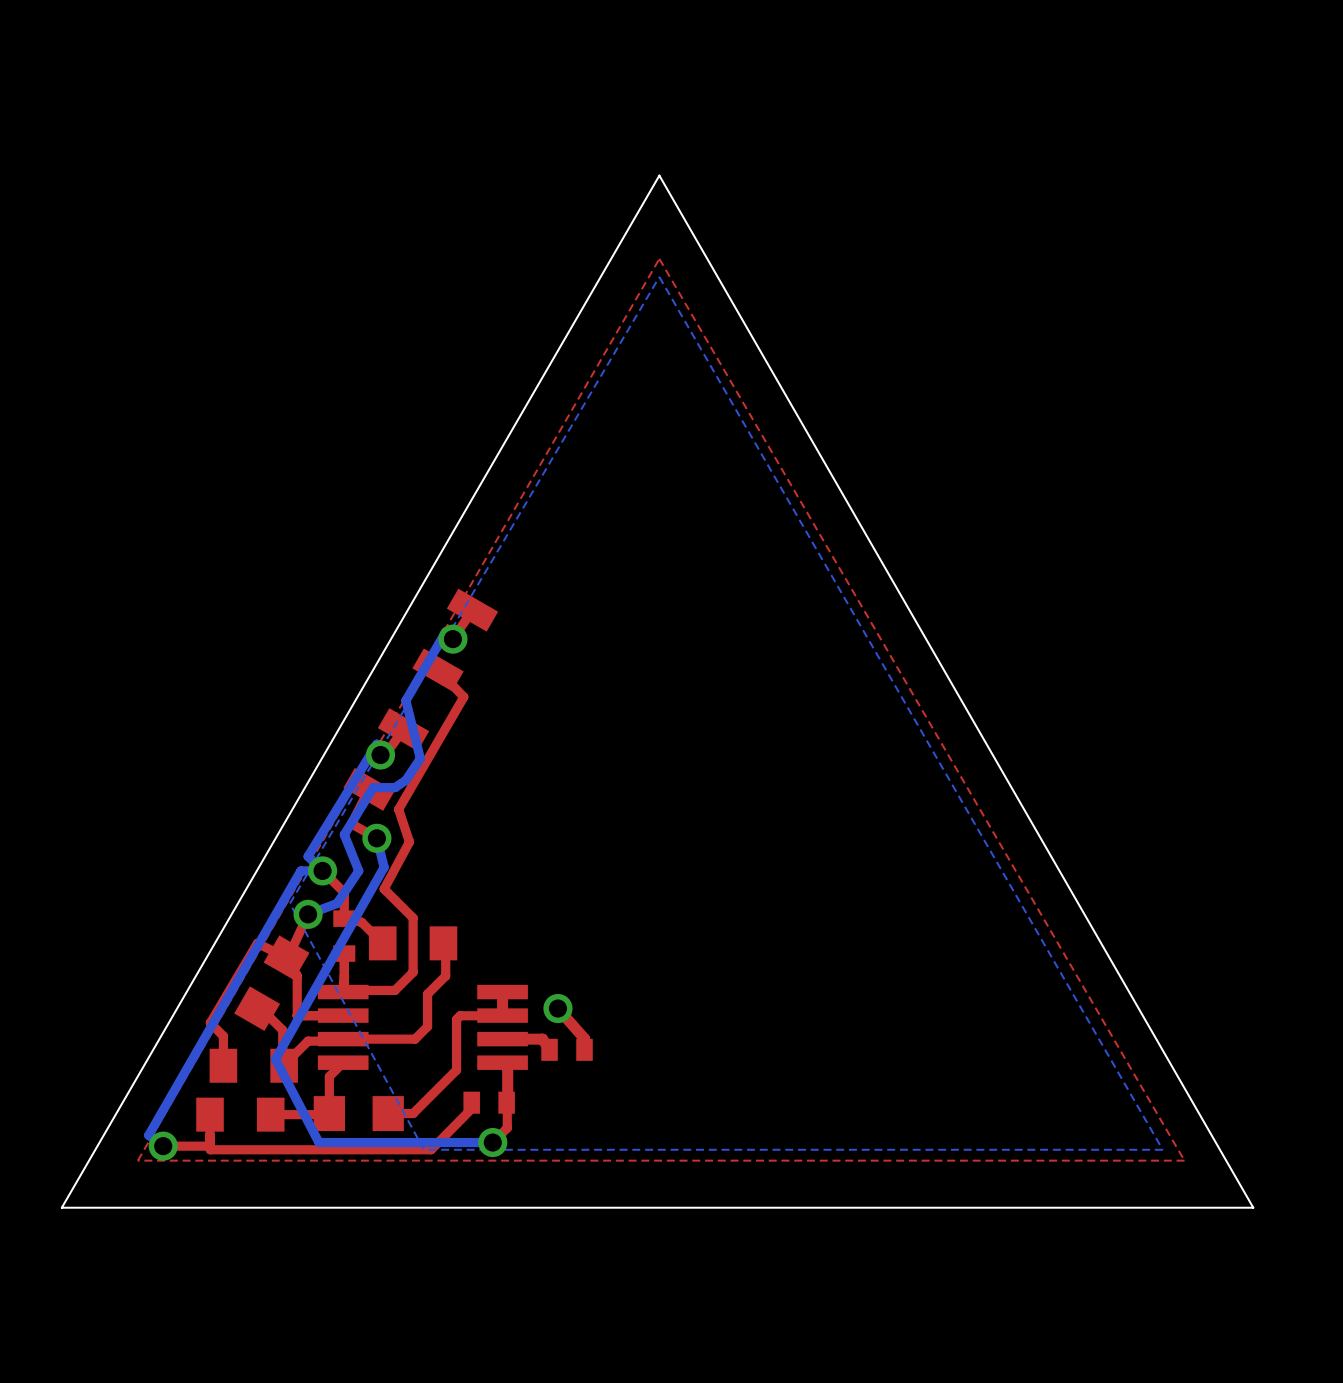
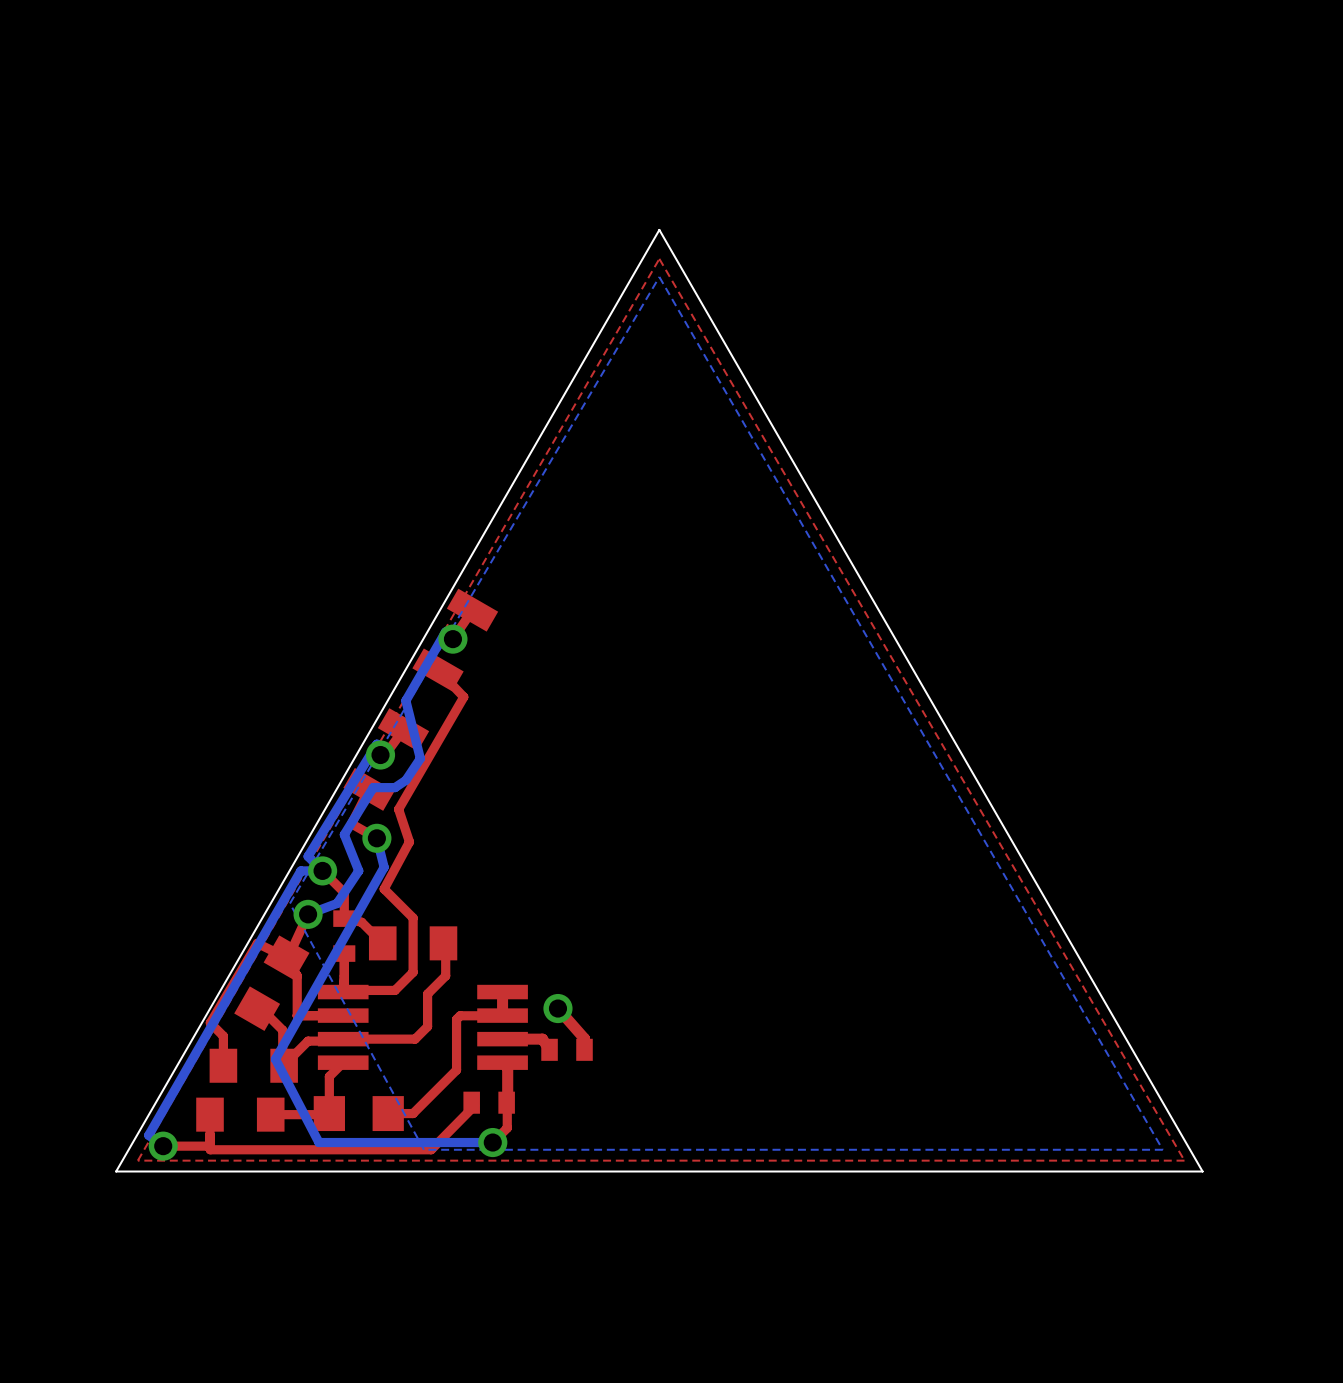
board edge: (659, 175) (1253, 1207) (61, 1207) (659, 175) -> (659, 229) (1202, 1171) (116, 1171) (659, 229)

